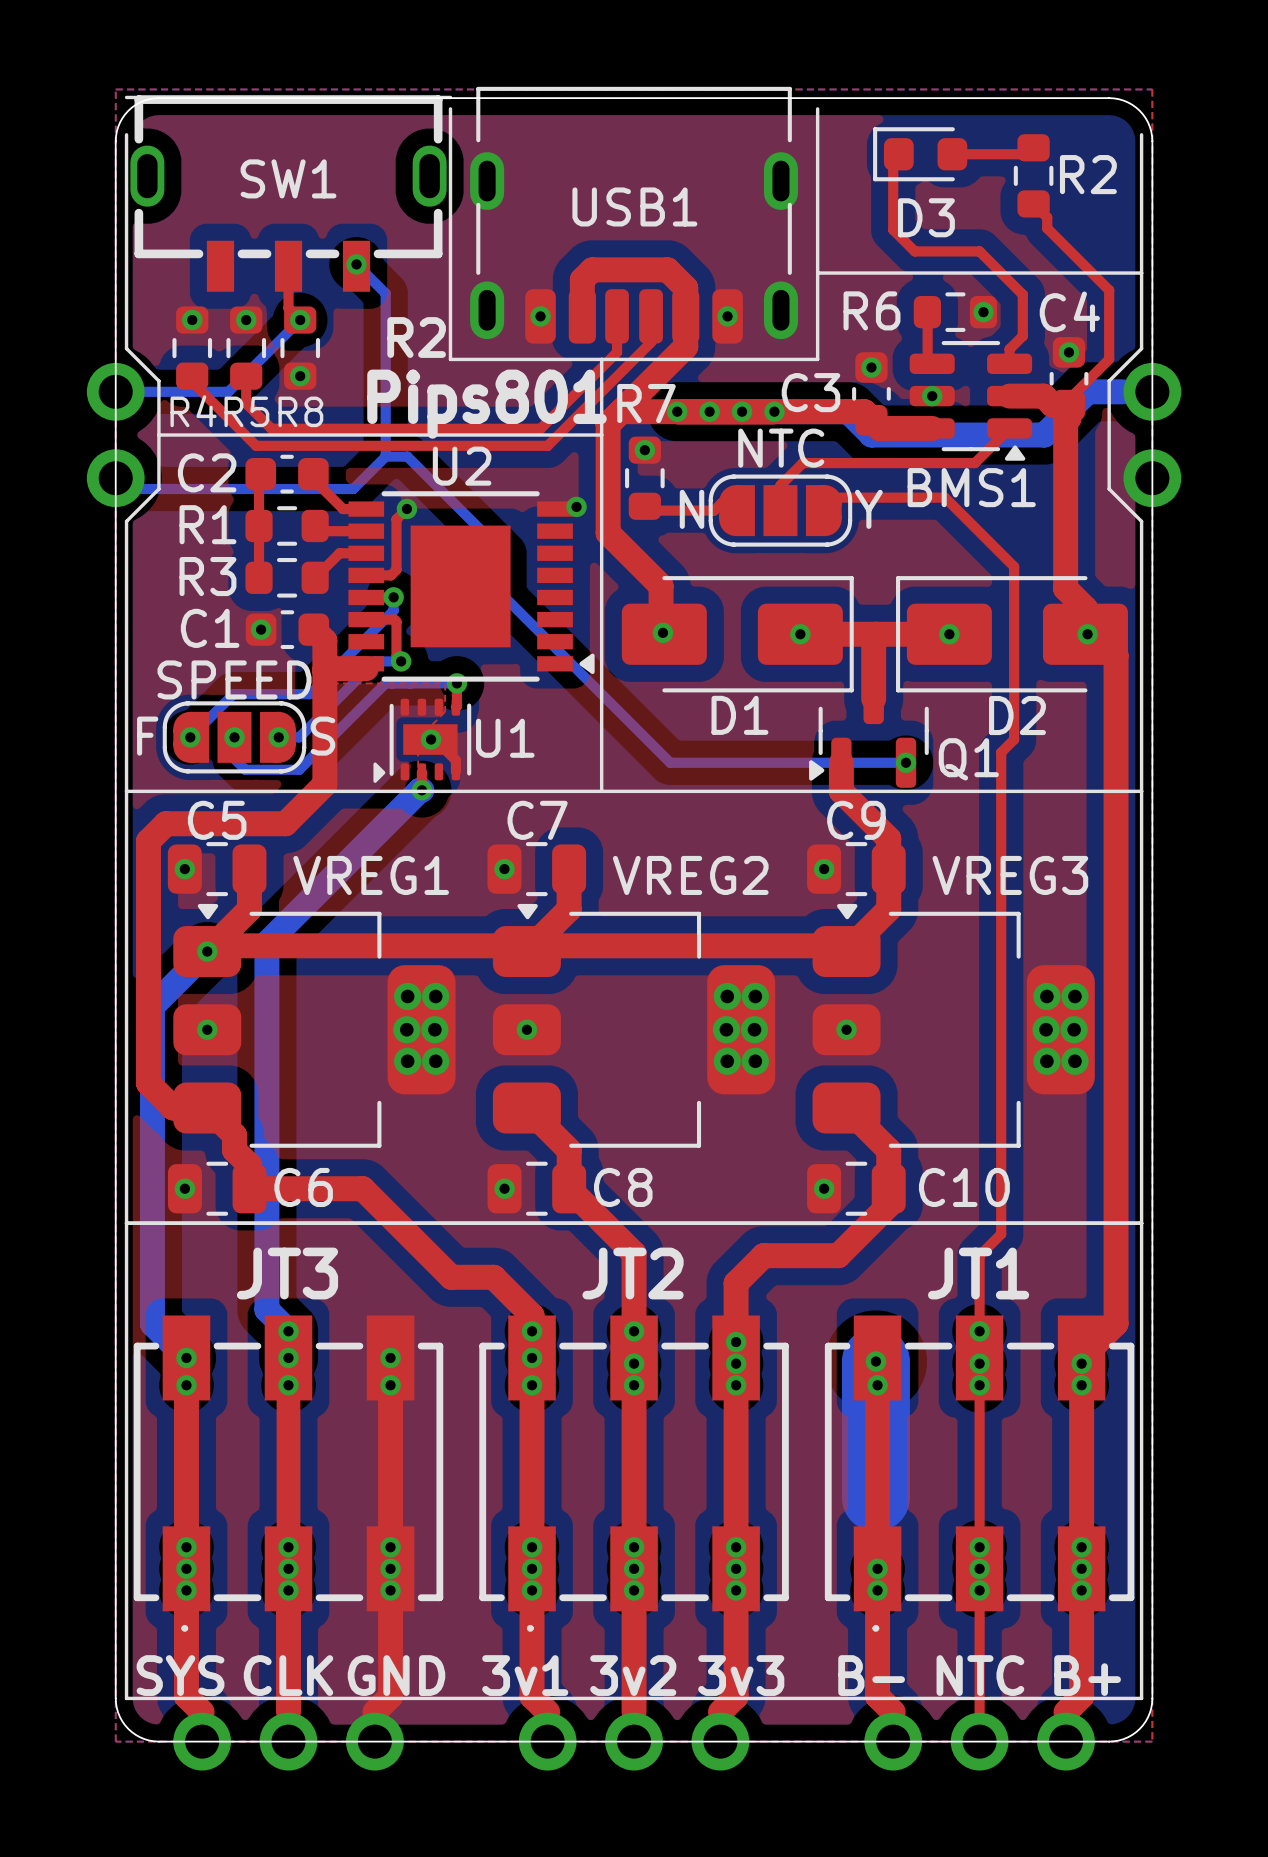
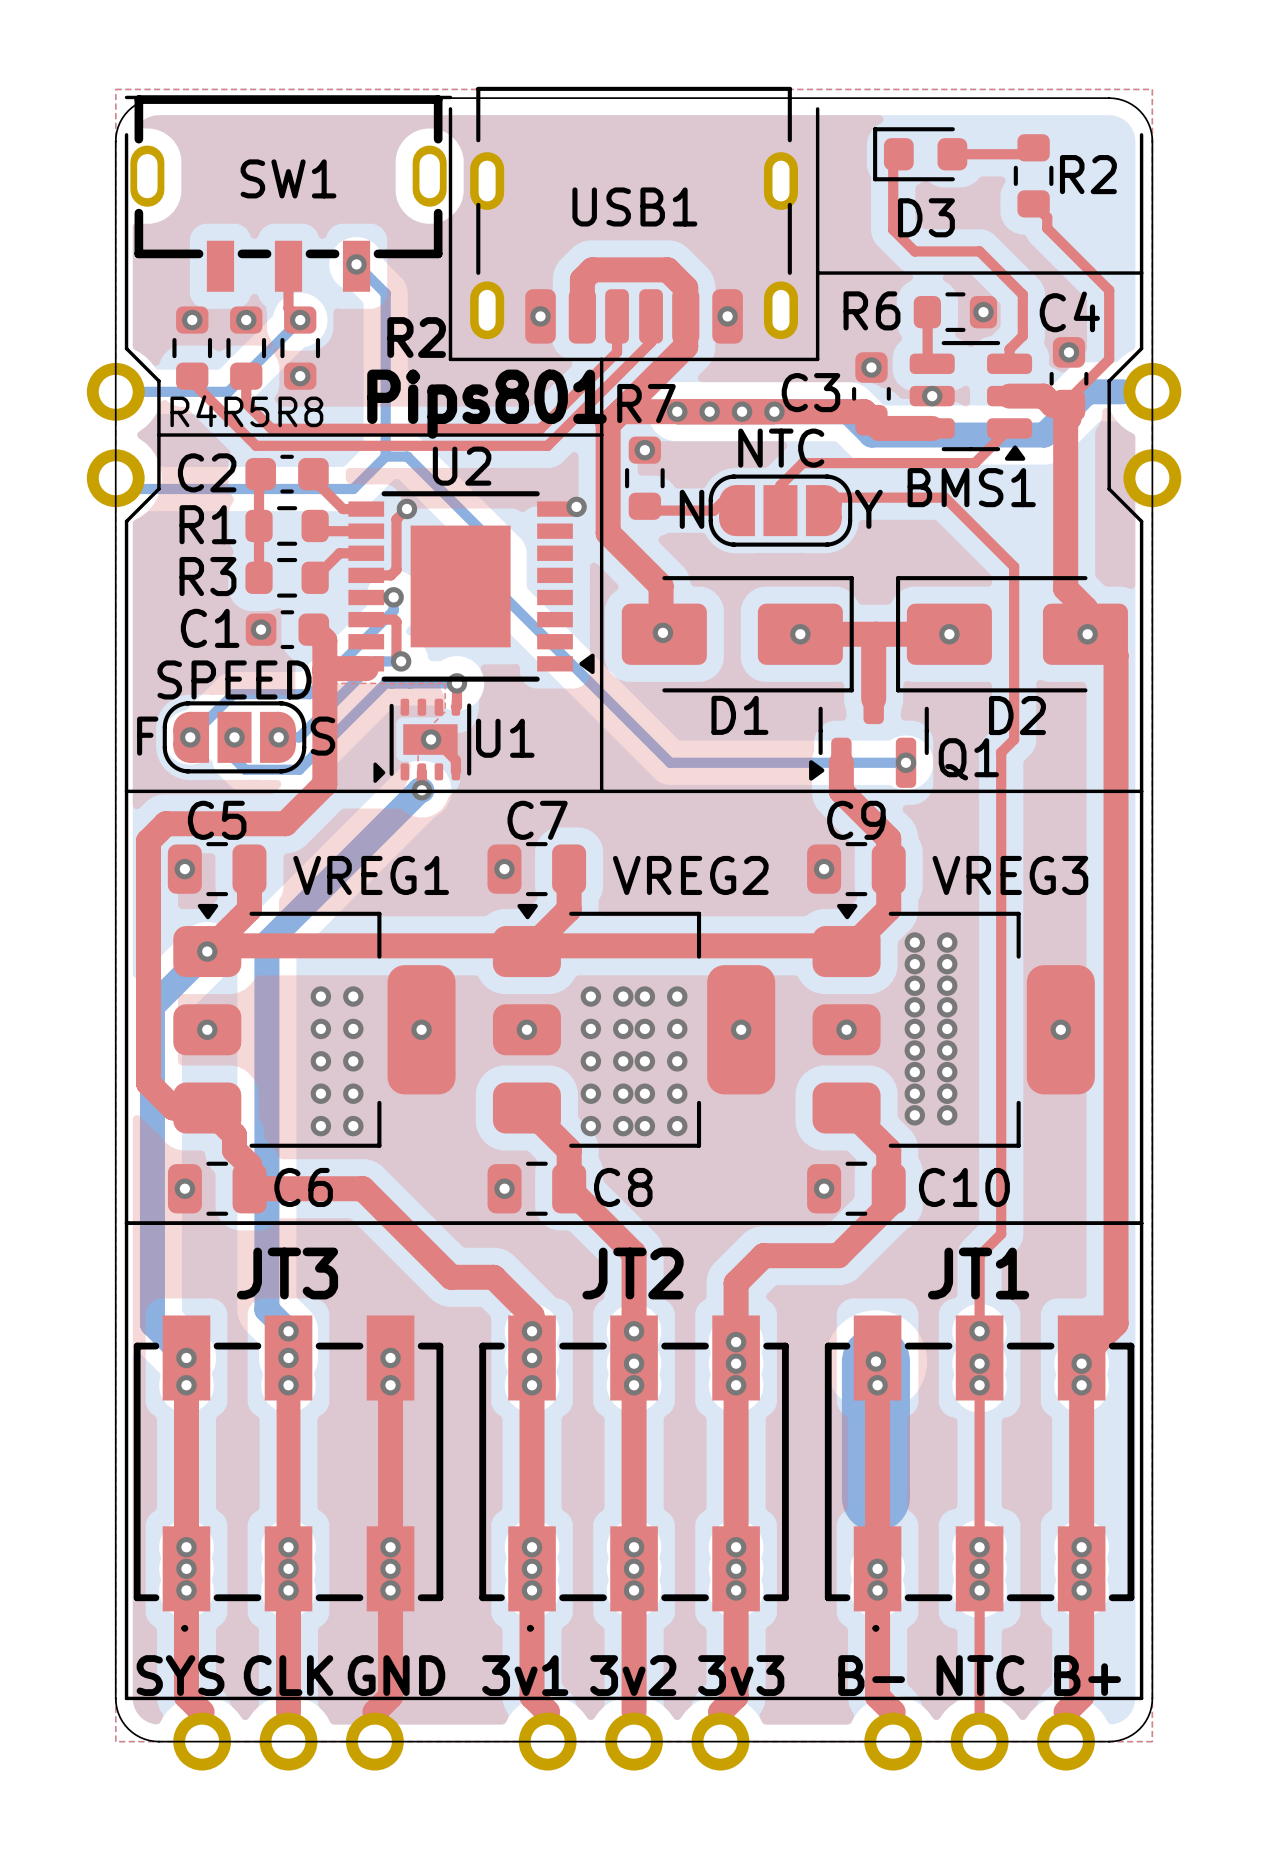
via: none -> (914, 942)
via: none -> (947, 942)
via: none -> (914, 964)
via: none -> (947, 964)
via: none -> (914, 985)
via: none -> (947, 985)
via: none -> (320, 996)
via: none -> (353, 996)
via: (407, 996) -> none
via: (435, 996) -> none
via: none -> (590, 996)
via: none -> (623, 996)
via: none -> (644, 996)
via: none -> (677, 996)
via: (727, 996) -> none
via: (755, 996) -> none
via: (1046, 996) -> none
via: (1074, 996) -> none
via: none -> (914, 1007)
via: none -> (947, 1007)
via: none -> (320, 1028)
via: none -> (353, 1028)
via: none -> (590, 1028)
via: none -> (623, 1028)
via: none -> (644, 1028)
via: none -> (677, 1028)
via: none -> (914, 1028)
via: none -> (947, 1028)
via: (406, 1029) -> none
via: none -> (421, 1029)
via: (434, 1029) -> none
via: (726, 1029) -> none
via: none -> (741, 1029)
via: (754, 1029) -> none
via: (1046, 1029) -> none
via: none -> (1060, 1029)
via: (1074, 1029) -> none
via: none -> (914, 1050)
via: none -> (947, 1050)
via: none -> (320, 1061)
via: none -> (353, 1061)
via: (407, 1061) -> none
via: (435, 1061) -> none
via: none -> (590, 1061)
via: none -> (623, 1061)
via: none -> (644, 1061)
via: none -> (677, 1061)
via: (727, 1061) -> none
via: (755, 1061) -> none
via: (1046, 1061) -> none
via: (1074, 1061) -> none
via: none -> (914, 1072)
via: none -> (947, 1072)
via: none -> (320, 1093)
via: none -> (353, 1093)
via: none -> (590, 1093)
via: none -> (623, 1093)
via: none -> (644, 1093)
via: none -> (677, 1093)
via: none -> (914, 1093)
via: none -> (947, 1093)
via: none -> (914, 1115)
via: none -> (947, 1115)
via: none -> (320, 1126)
via: none -> (353, 1126)
via: none -> (590, 1126)
via: none -> (623, 1126)
via: none -> (644, 1126)
via: none -> (677, 1126)

